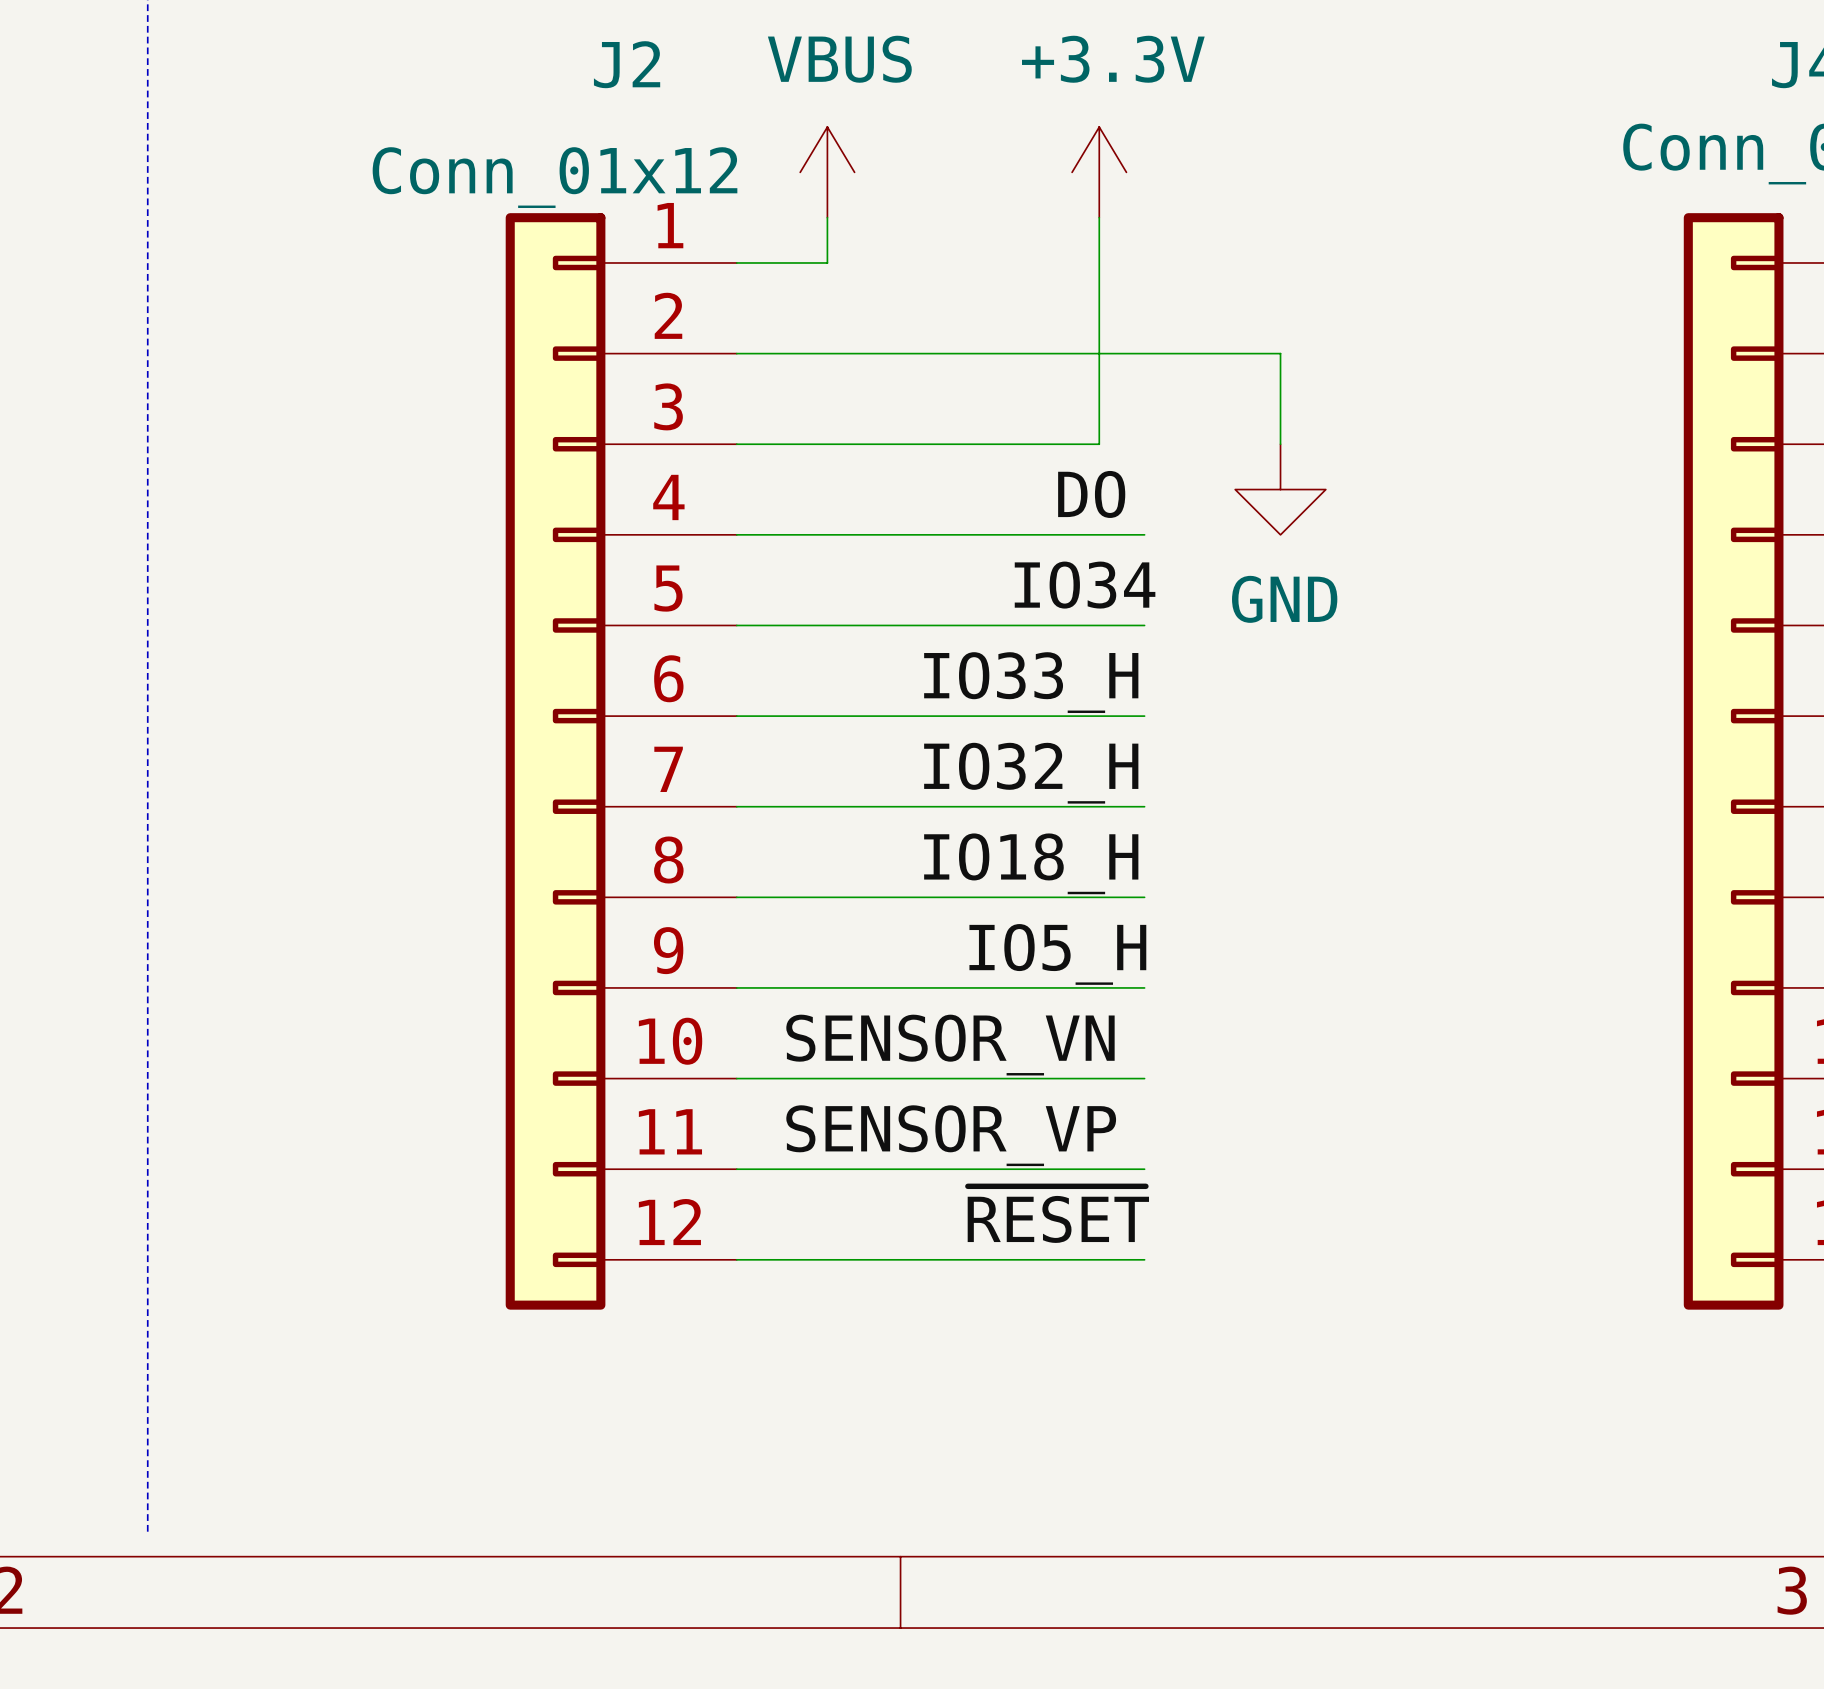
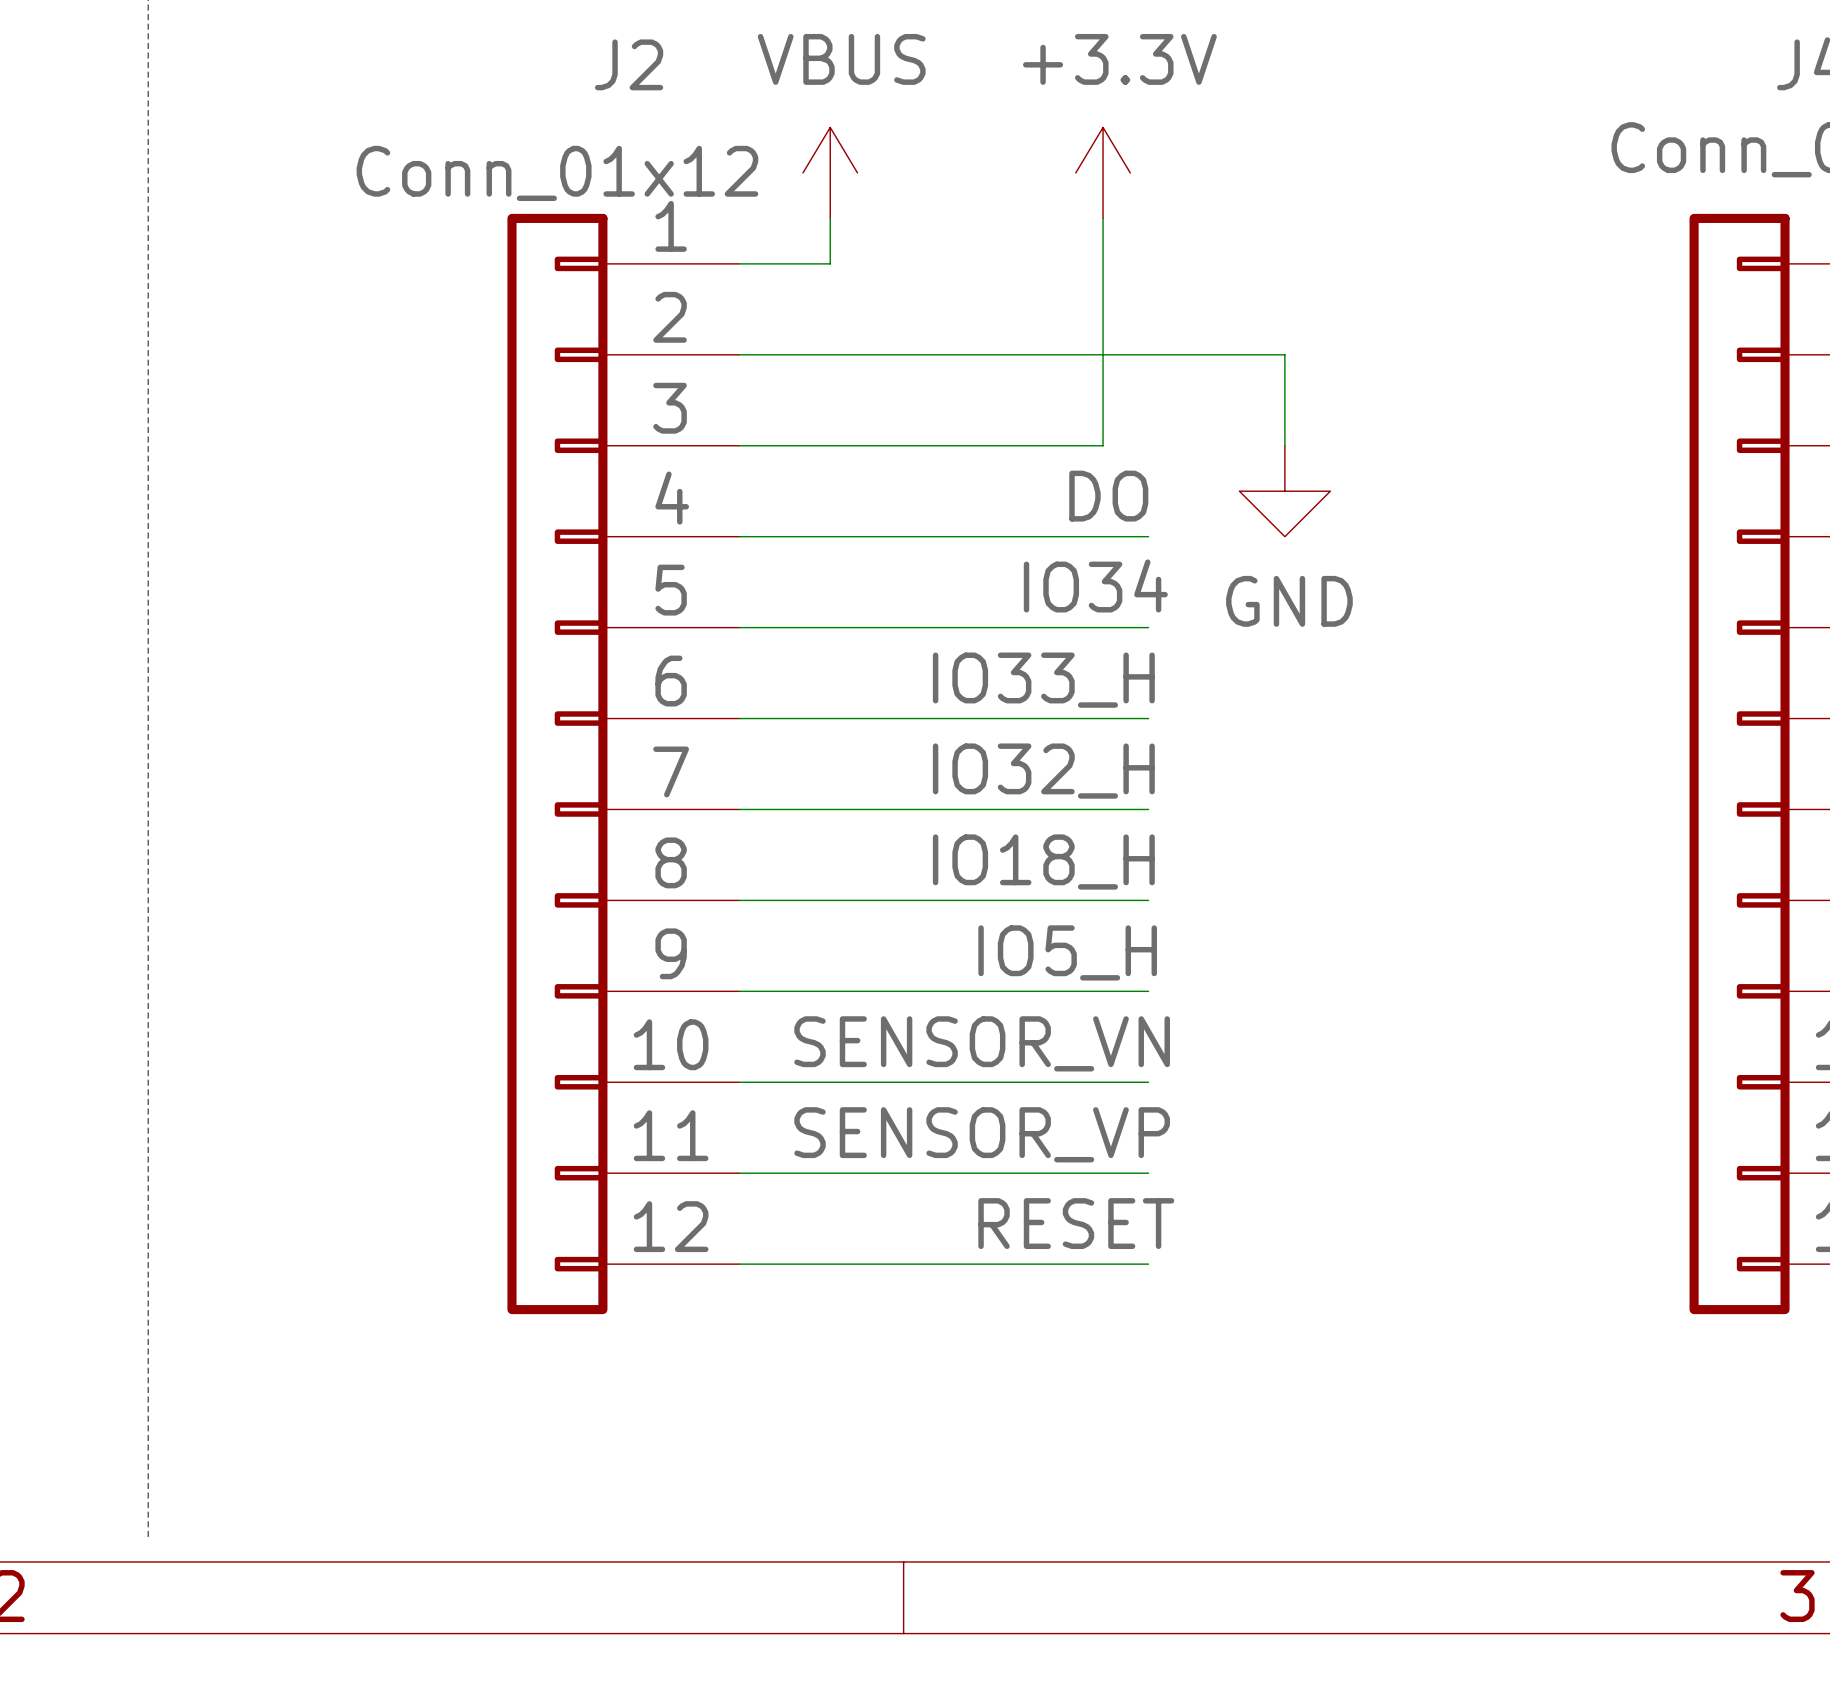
label: ~{RESET} (1058, 1214) -> RESET (1076, 1223)

